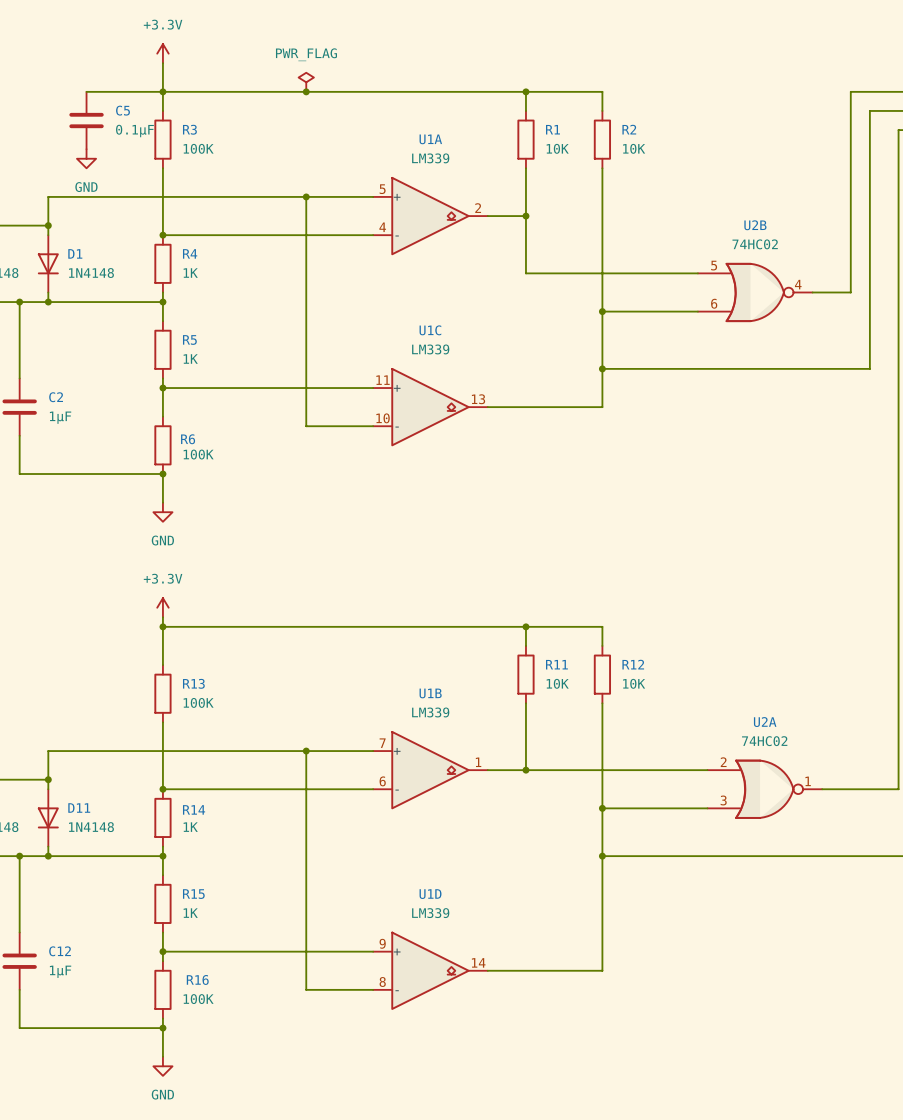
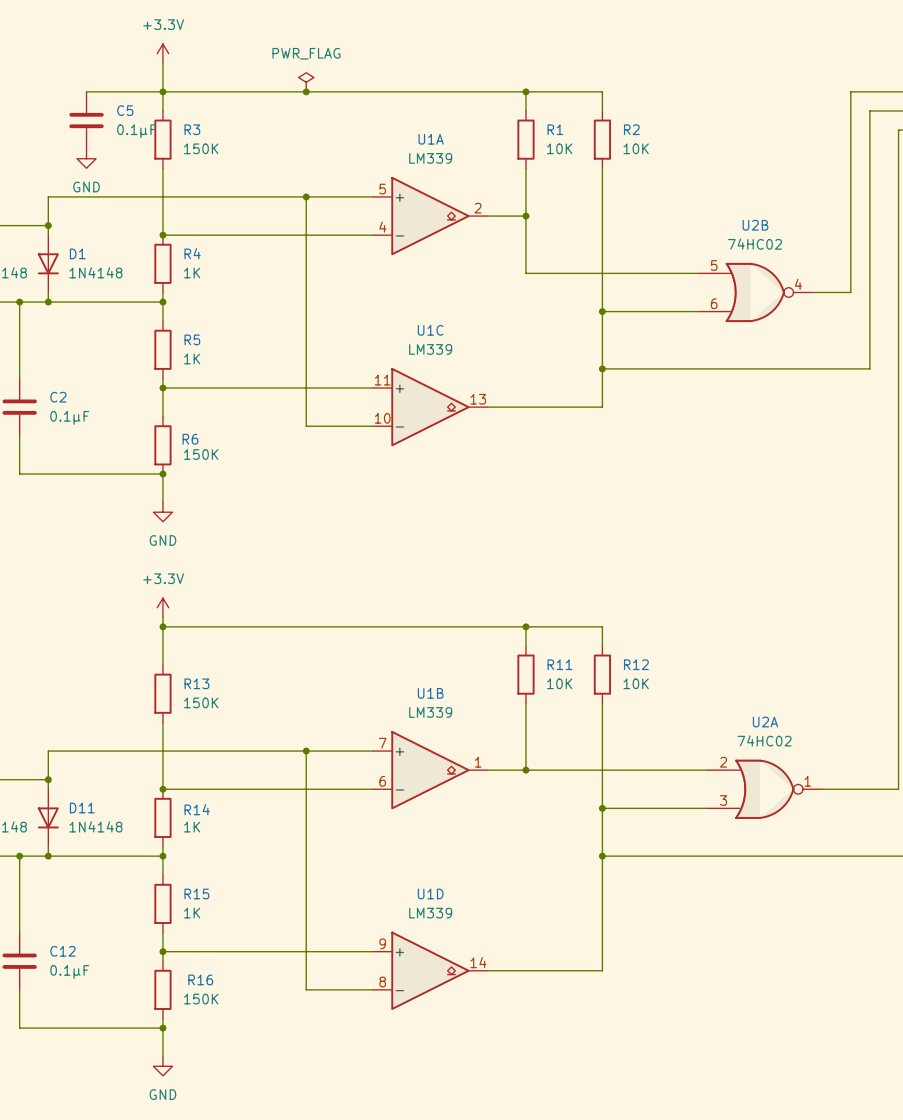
R3 value: 100K (198, 148) -> 150K (201, 148)
C2 value: 1µF (60, 417) -> 0.1µF (69, 417)
R6 value: 100K (198, 454) -> 150K (201, 454)
R13 value: 100K (198, 702) -> 150K (201, 702)
C12 value: 1µF (60, 971) -> 0.1µF (69, 972)
R16 value: 100K (198, 999) -> 150K (201, 999)

